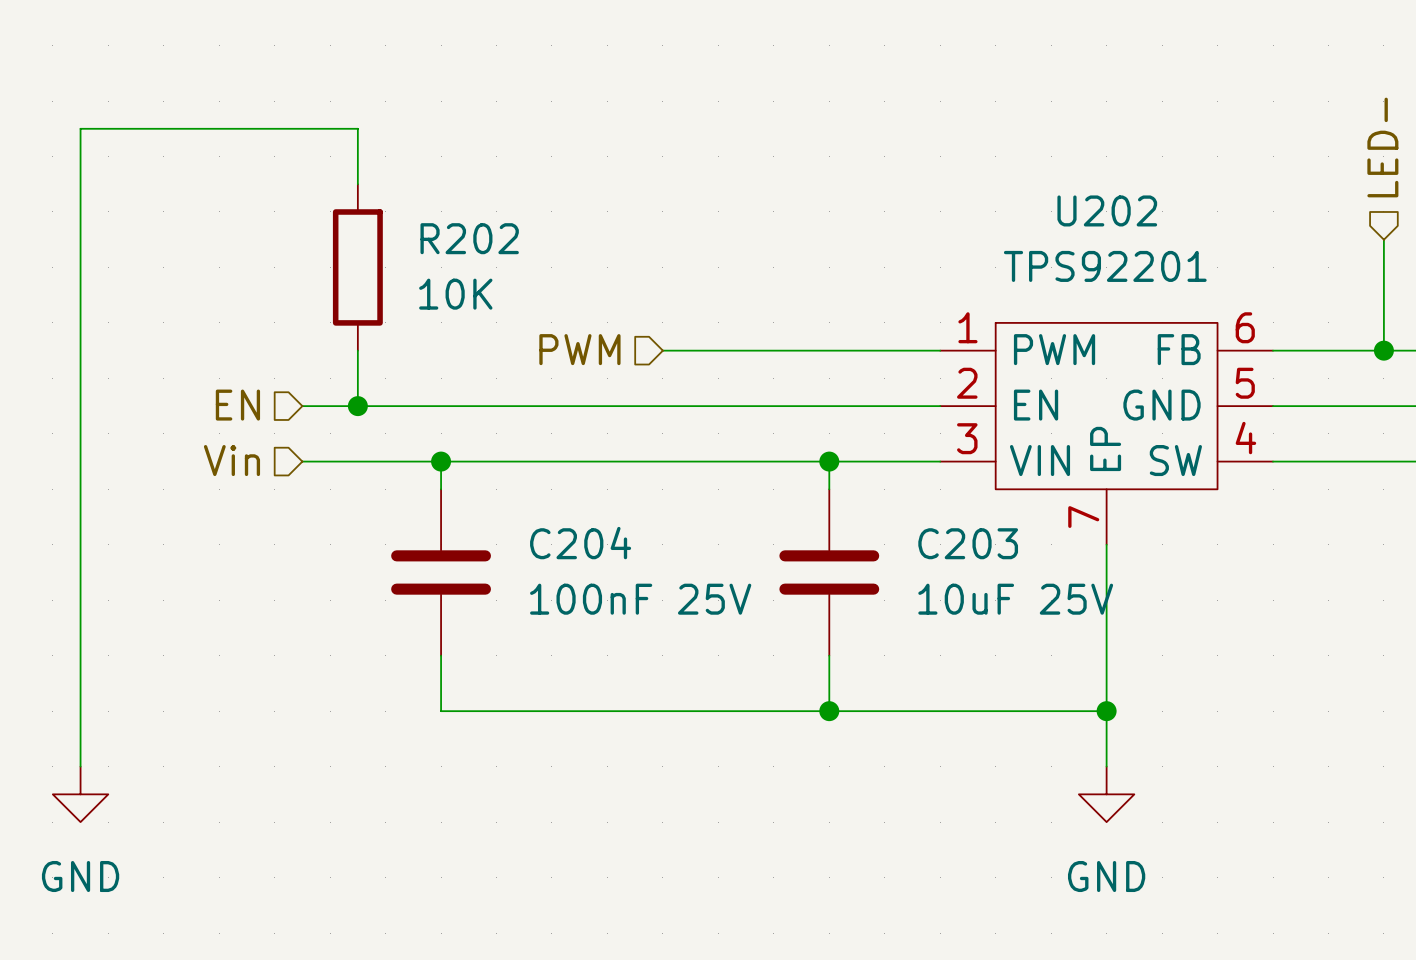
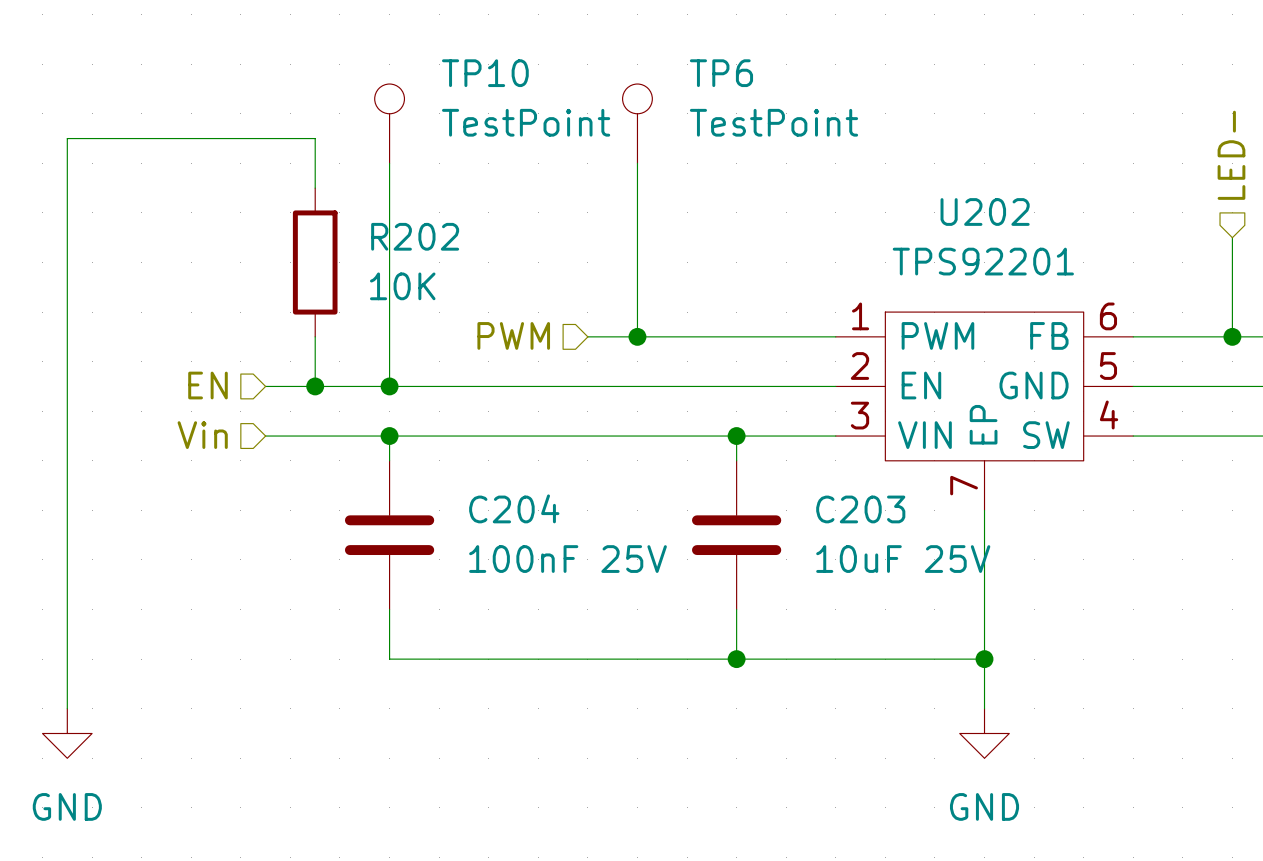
TP10: none -> TestPoint (389, 123)
TP6: none -> TestPoint (637, 123)
wire: none -> (389, 163) (389, 386)
wire: none -> (637, 163) (637, 336)
junction: none -> (637, 336)
junction: none -> (389, 386)

